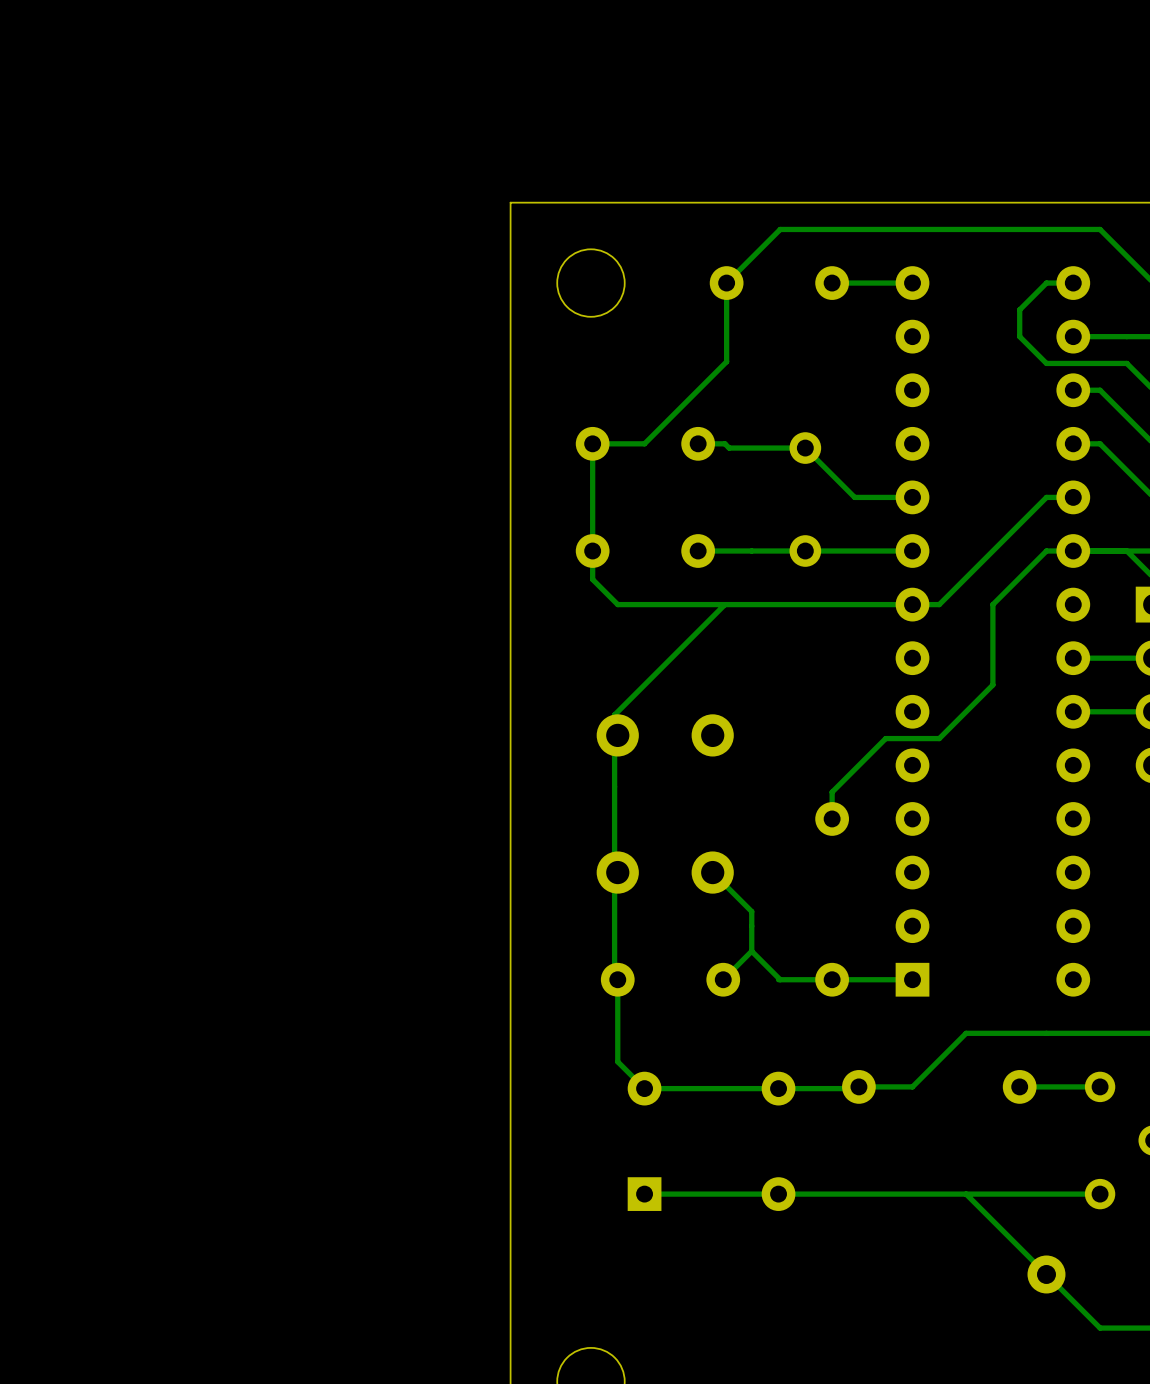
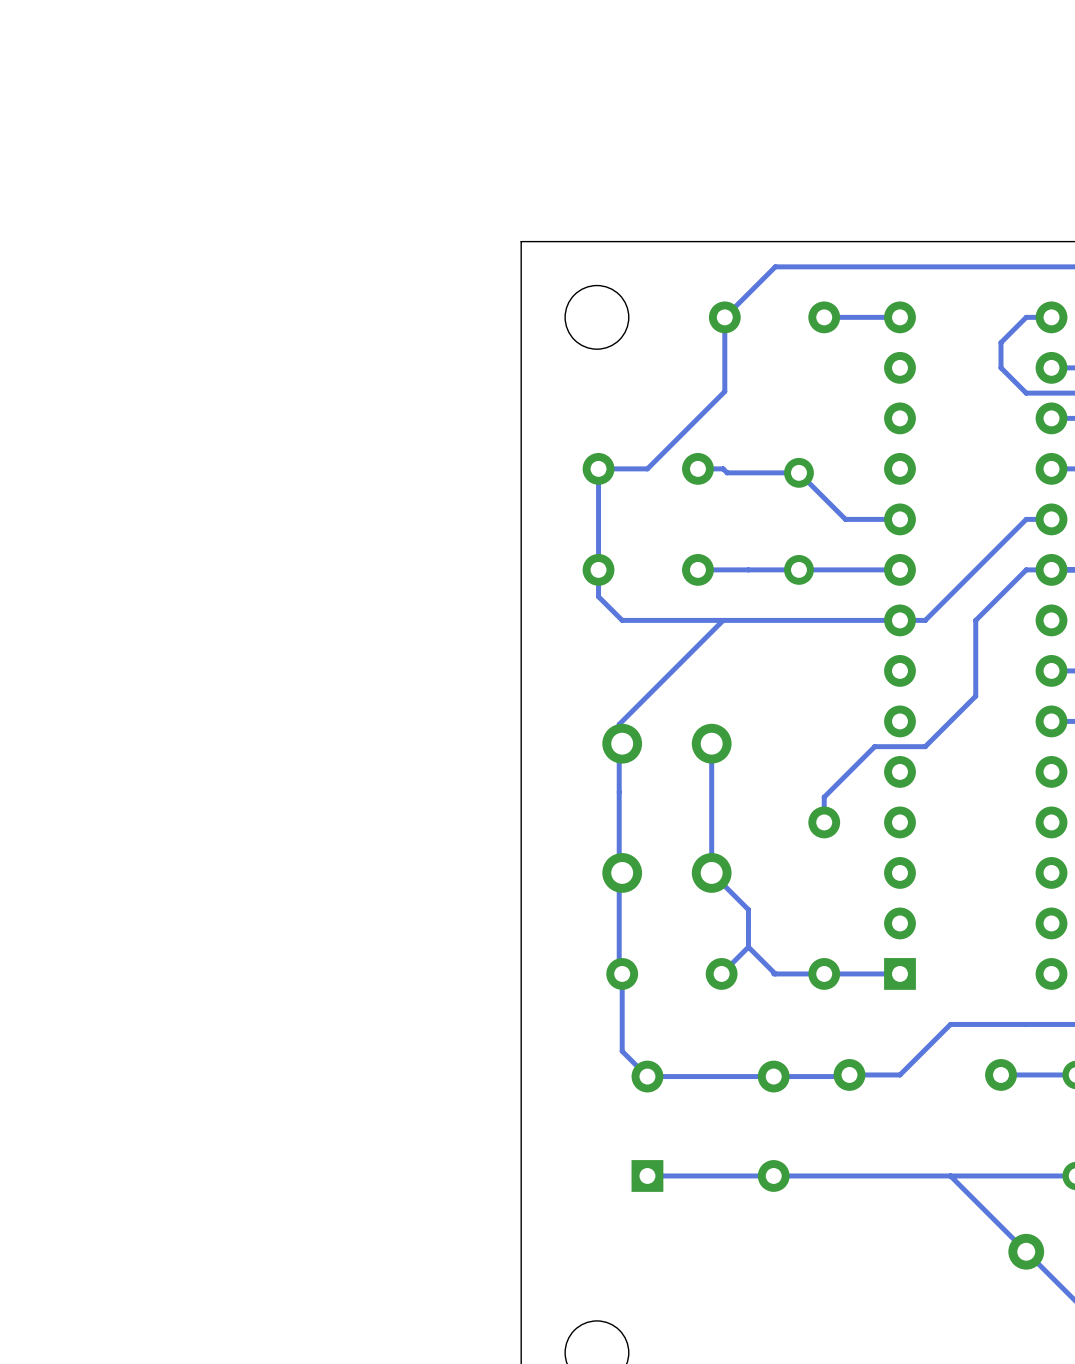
bottom track: none -> (711, 743) (711, 872)

